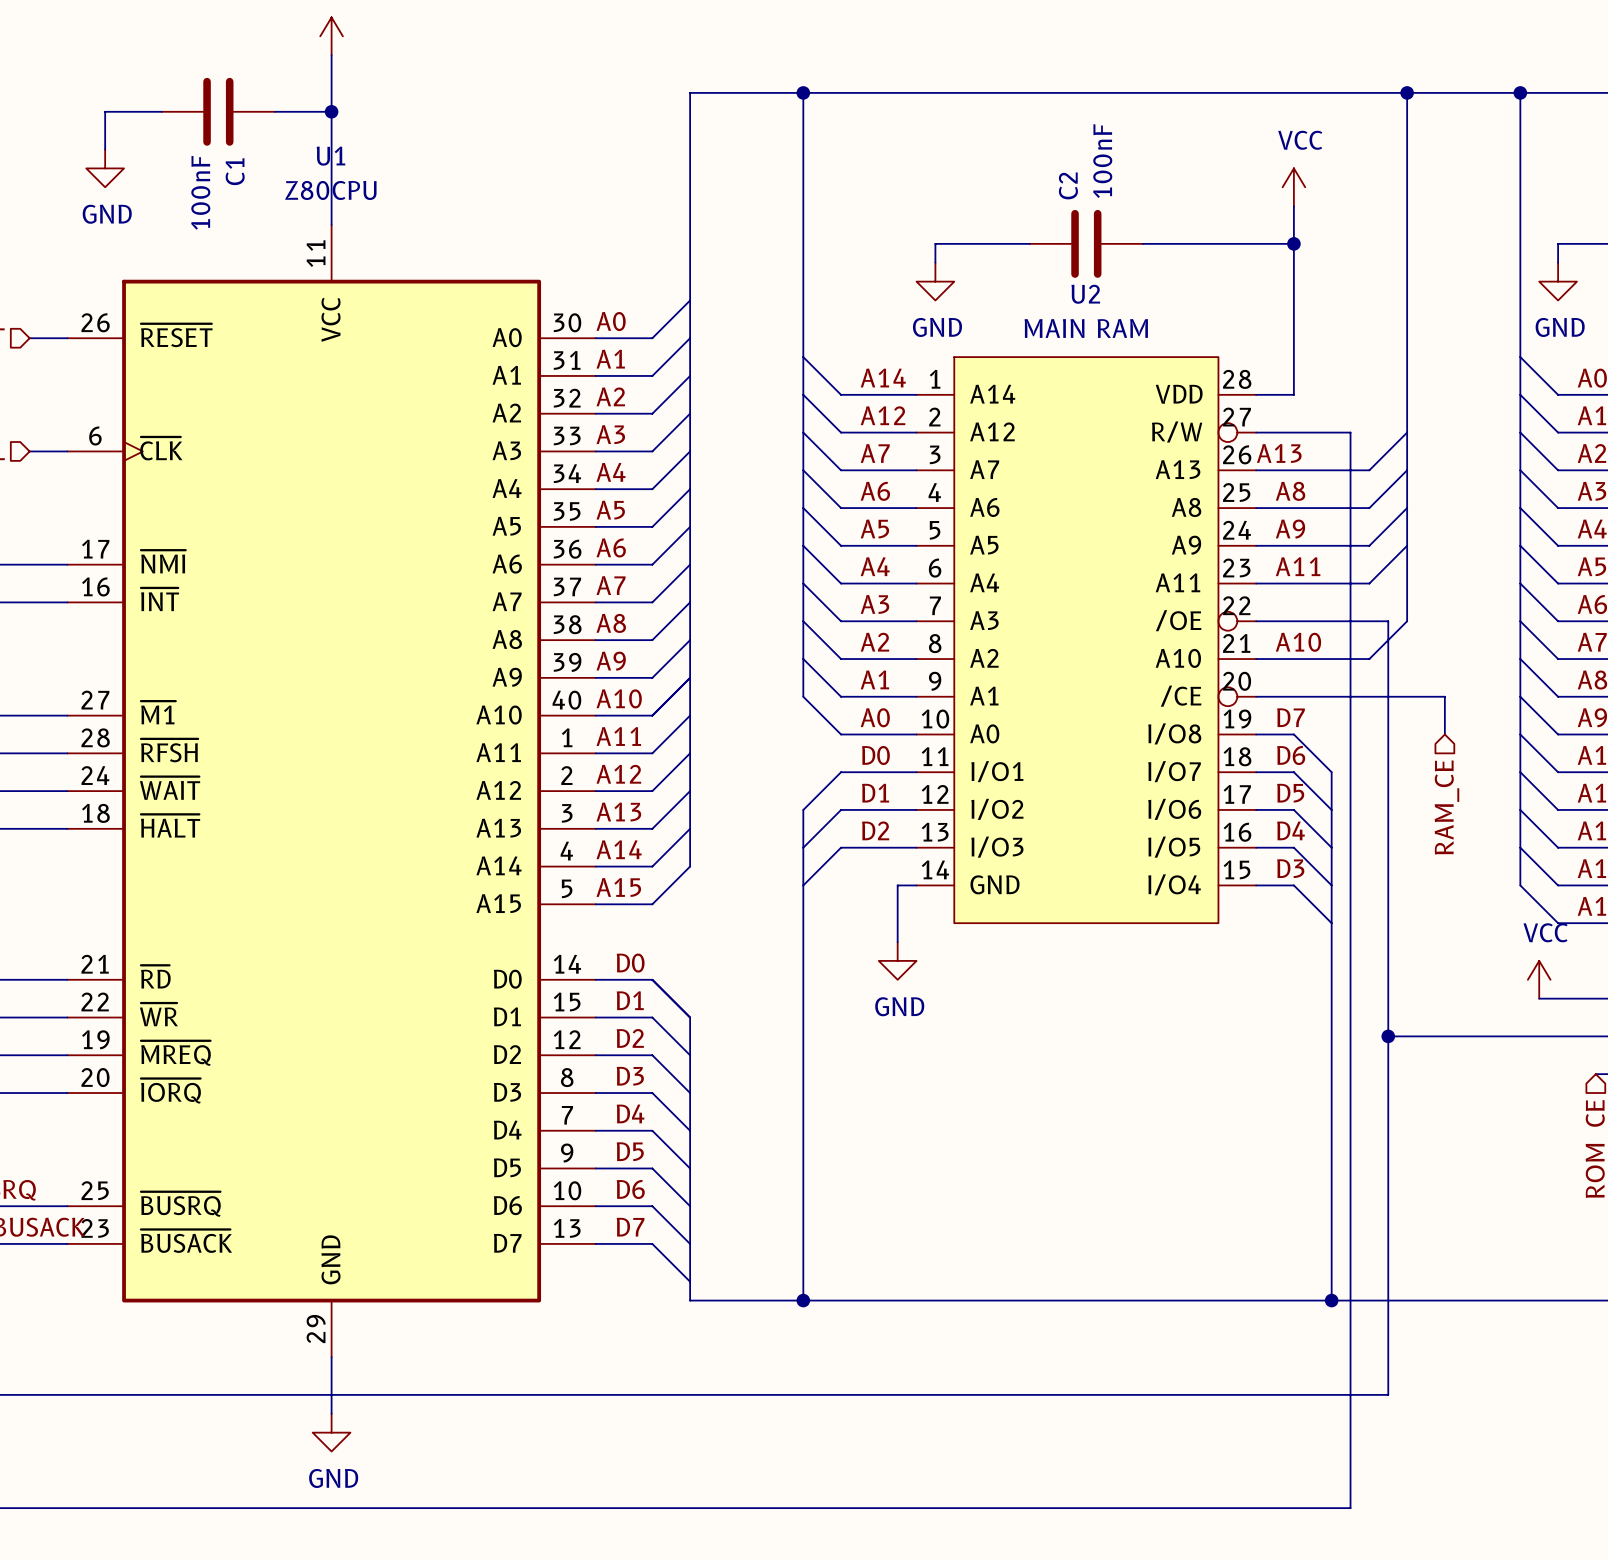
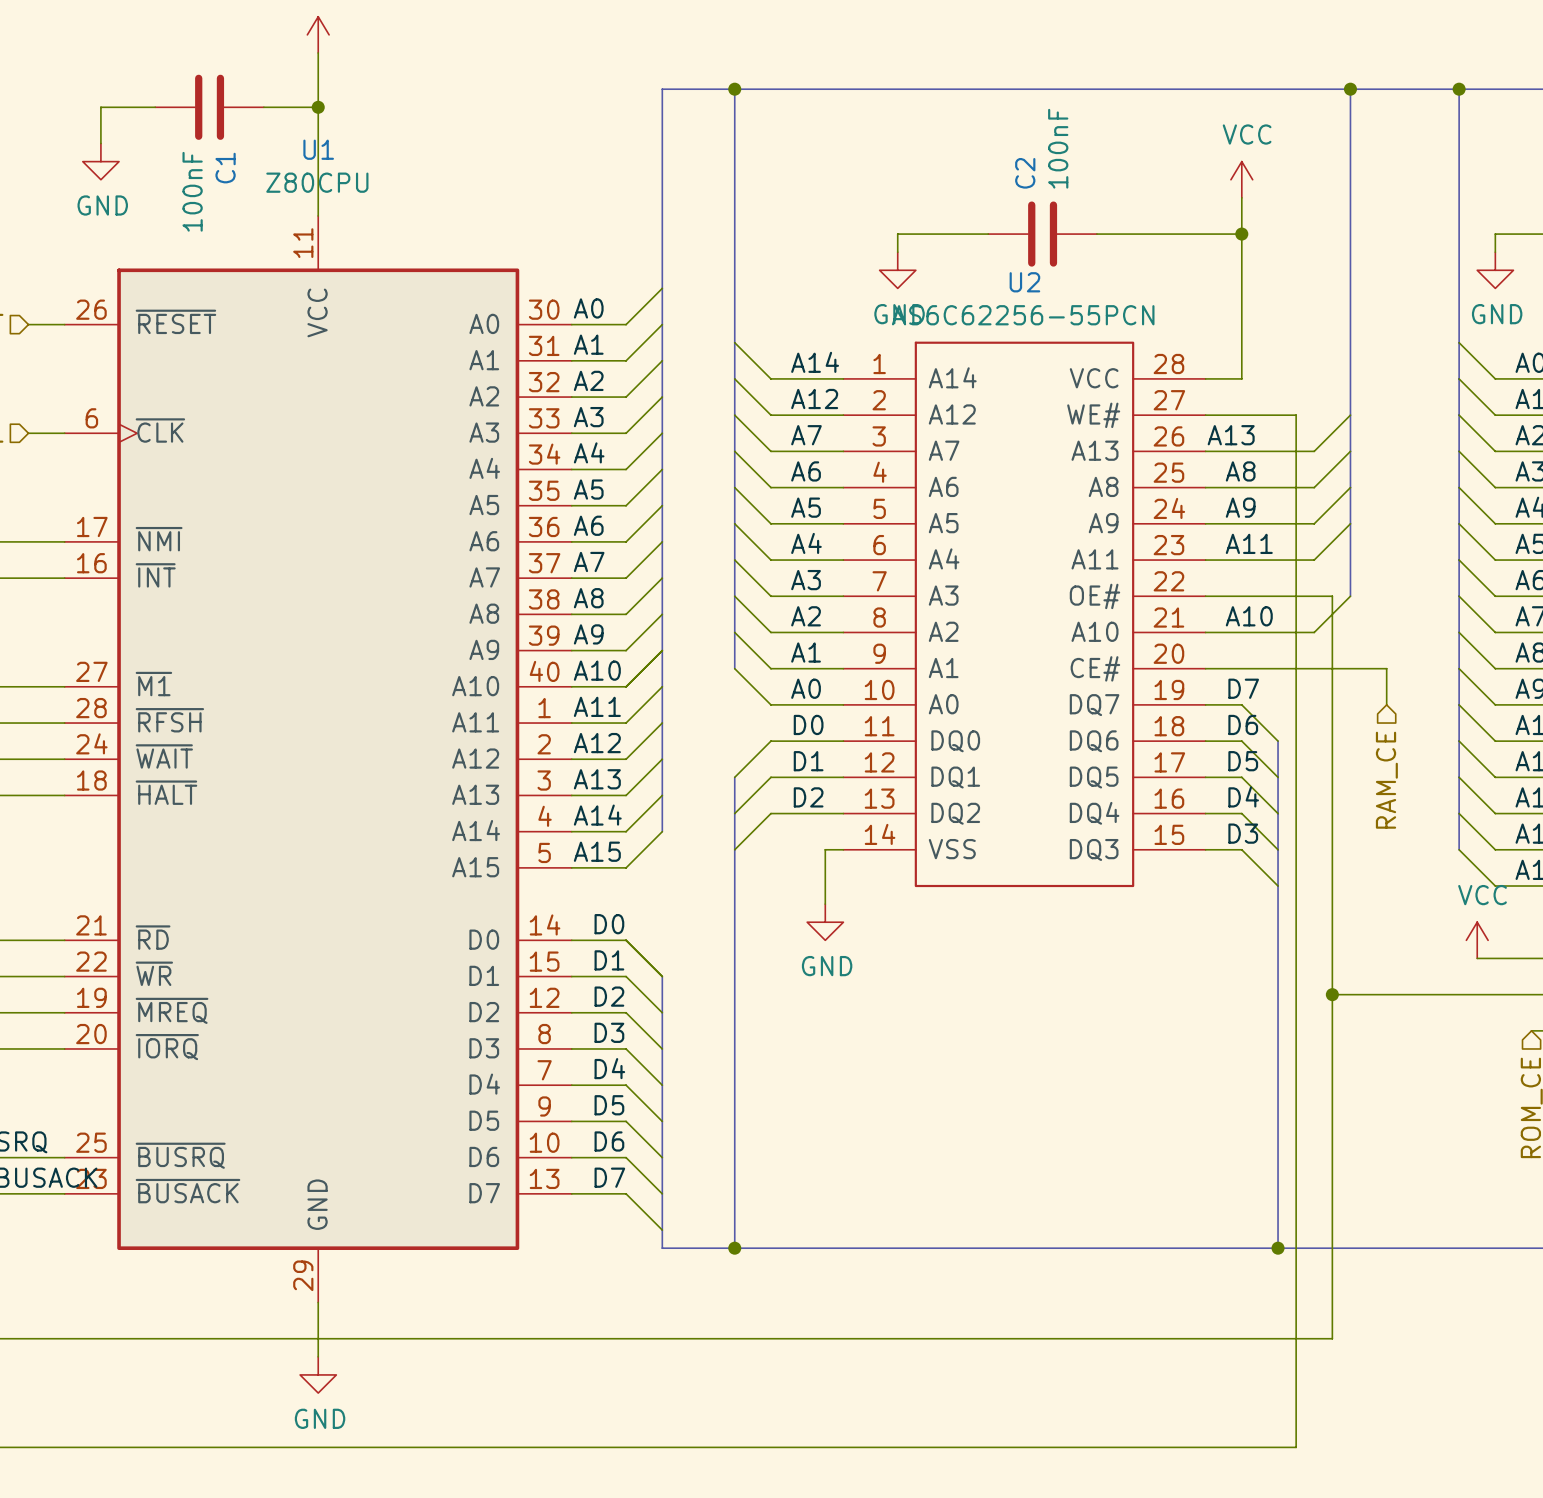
bus: (803, 92) (803, 696) -> (734, 89) (734, 668)
junction position: (803, 92) -> (734, 89)
U2 value: MAIN RAM (1086, 328) -> AS6C62256-55PCN (1023, 315)
wire: (803, 357) (841, 394) -> (734, 342) (770, 378) (807, 378)
U2 symbol: [916, 357, 1257, 924] -> [843, 341, 1206, 888]
label position: A14 (883, 378) -> A14 (815, 362)
wire: (803, 394) (841, 432) -> (734, 378) (770, 415) (807, 415)
label position: A12 (883, 415) -> A12 (814, 399)
wire: (803, 432) (841, 470) -> (734, 415) (770, 451) (807, 451)
label position: A7 (875, 453) -> A7 (806, 435)
wire: (803, 470) (841, 508) -> (734, 451) (770, 487) (807, 487)
label position: A6 (875, 491) -> A6 (806, 471)
wire: (803, 508) (841, 545) -> (734, 487) (770, 523) (807, 523)
label position: A5 (874, 528) -> A5 (806, 507)
wire: (803, 545) (841, 583) -> (734, 523) (770, 560) (807, 560)
label position: A4 (875, 566) -> A4 (806, 543)
wire: (803, 583) (841, 621) -> (734, 560) (770, 596) (807, 596)
label position: A3 (874, 604) -> A3 (806, 580)
wire: (803, 621) (841, 659) -> (734, 596) (770, 632) (807, 632)
label position: A2 (874, 642) -> A2 (806, 616)
wire: (803, 659) (841, 696) -> (734, 632) (770, 668) (807, 668)
label position: A1 (874, 679) -> A1 (806, 652)
wire: (803, 696) (841, 734) -> (734, 668) (770, 704) (807, 704)
label position: A0 (875, 717) -> A0 (806, 688)
label position: D0 (875, 755) -> D0 (808, 724)
wire: (841, 772) (803, 809) -> (807, 741) (770, 741) (734, 777)
label position: D1 (875, 793) -> D1 (808, 761)
bus: (803, 809) (803, 1300) -> (734, 777) (734, 1248)
wire: (841, 809) (803, 847) -> (807, 777) (770, 777) (734, 813)
label position: D2 (875, 830) -> D2 (808, 797)
wire: (841, 847) (803, 885) -> (807, 813) (770, 813) (734, 849)
wire: (916, 885) (897, 885) (897, 942) -> (843, 849) (825, 849) (825, 904)
power symbol position: GND (897, 960) -> GND (825, 922)
junction position: (803, 1300) -> (734, 1248)

